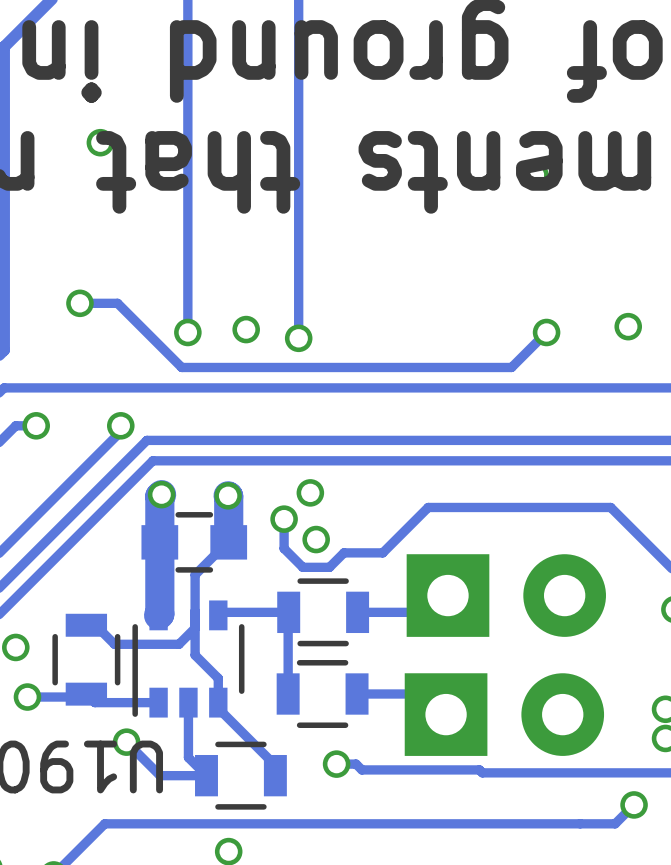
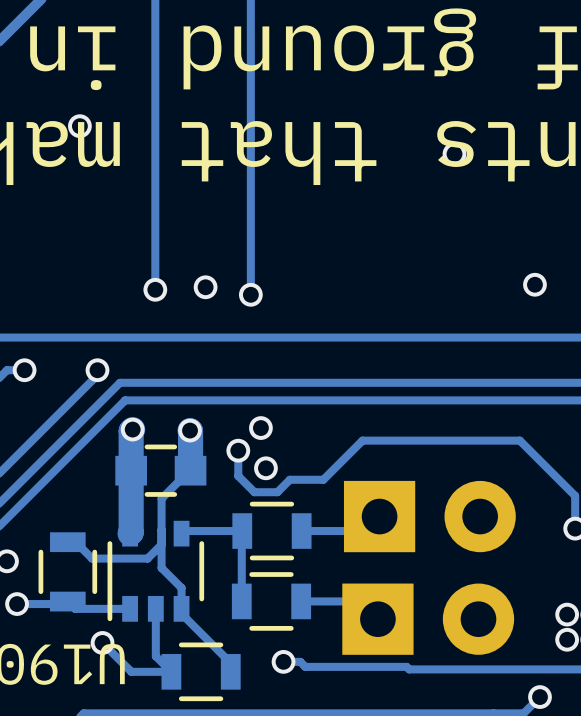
track: (79, 303) (117, 303) (181, 367) (511, 367) (546, 332) -> none
via: (79, 303) -> none
via: (546, 332) -> none

